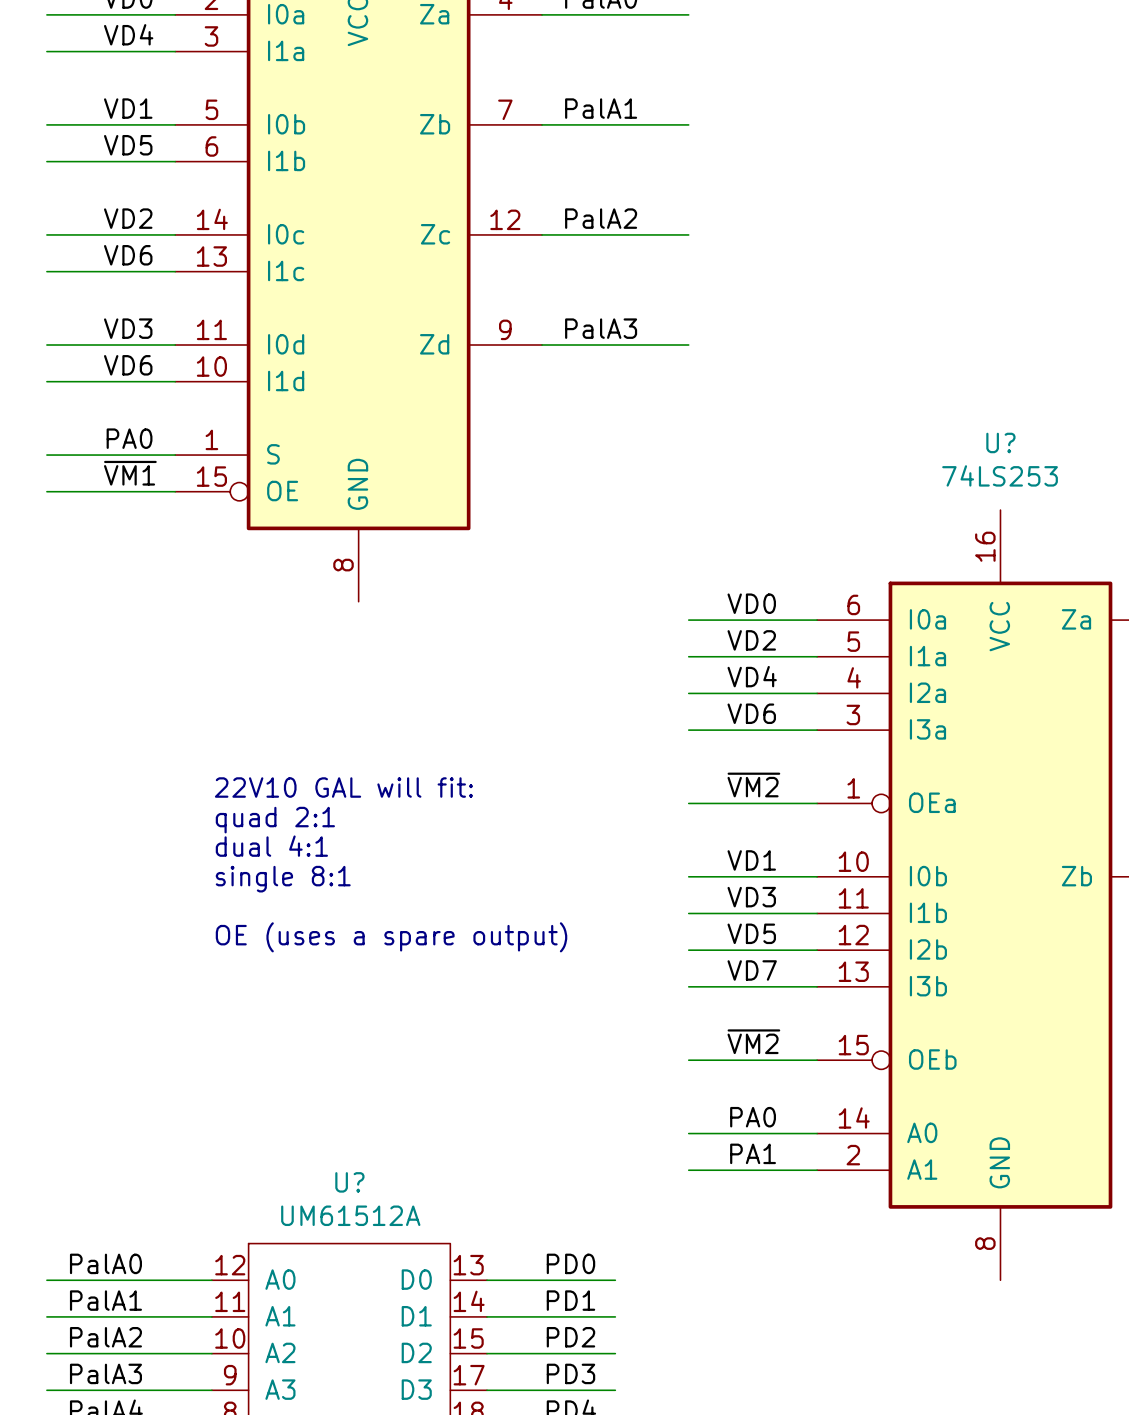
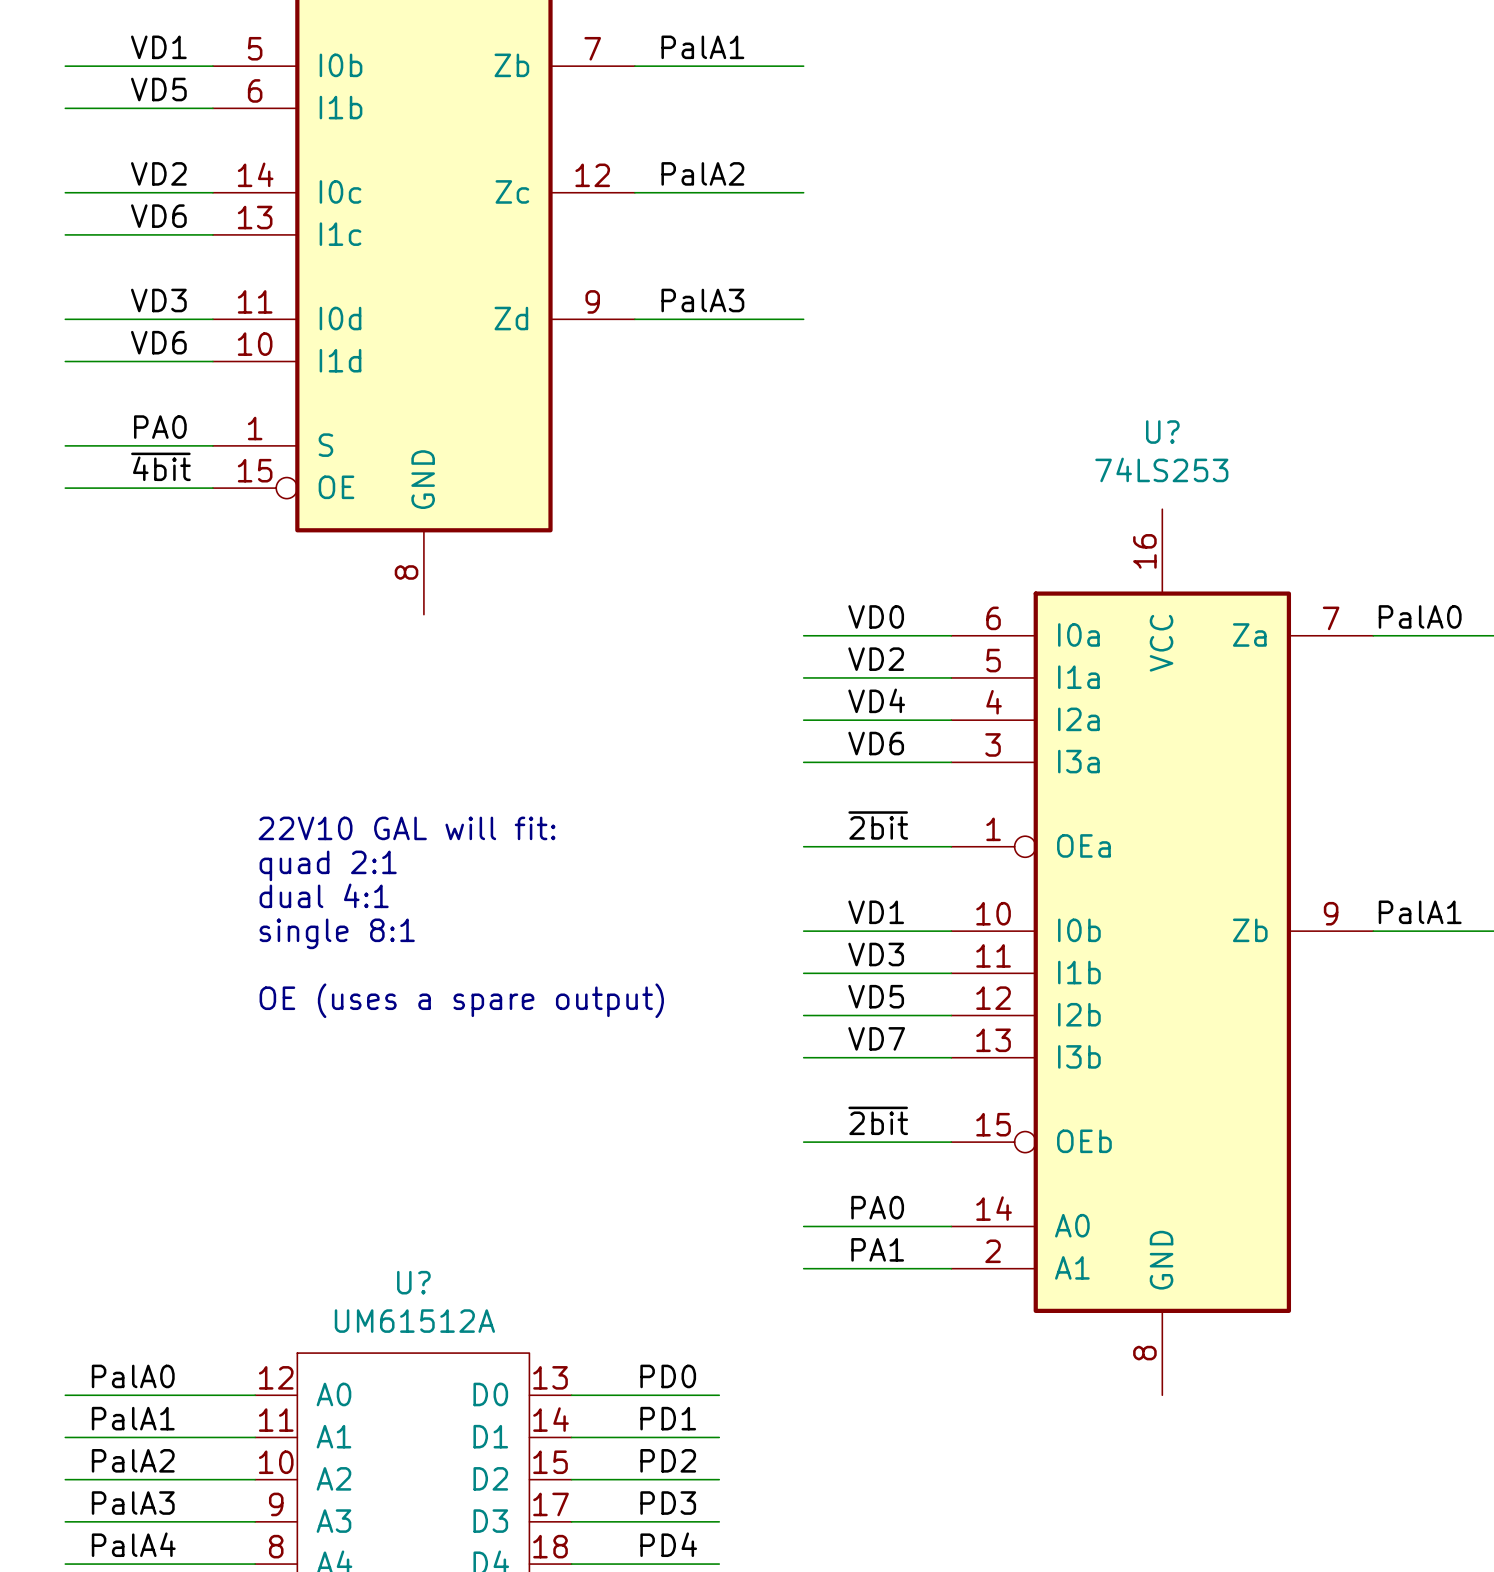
label: ~{VM1} (130, 473) -> ~{4bit} (160, 466)
label: ~{VM2} (753, 784) -> ~{2bit} (878, 825)
label: ~{VM2} (753, 1041) -> ~{2bit} (878, 1120)

